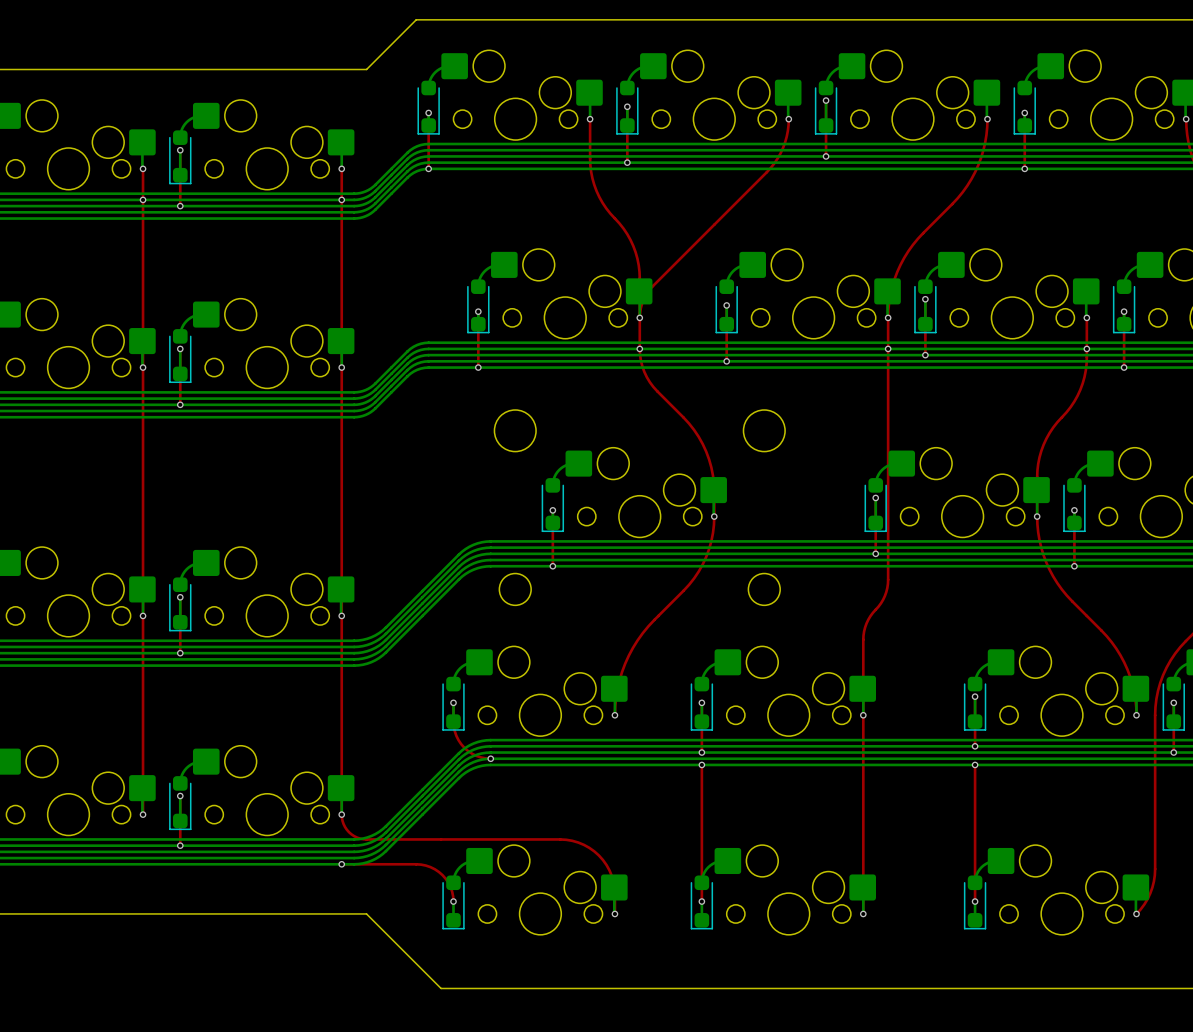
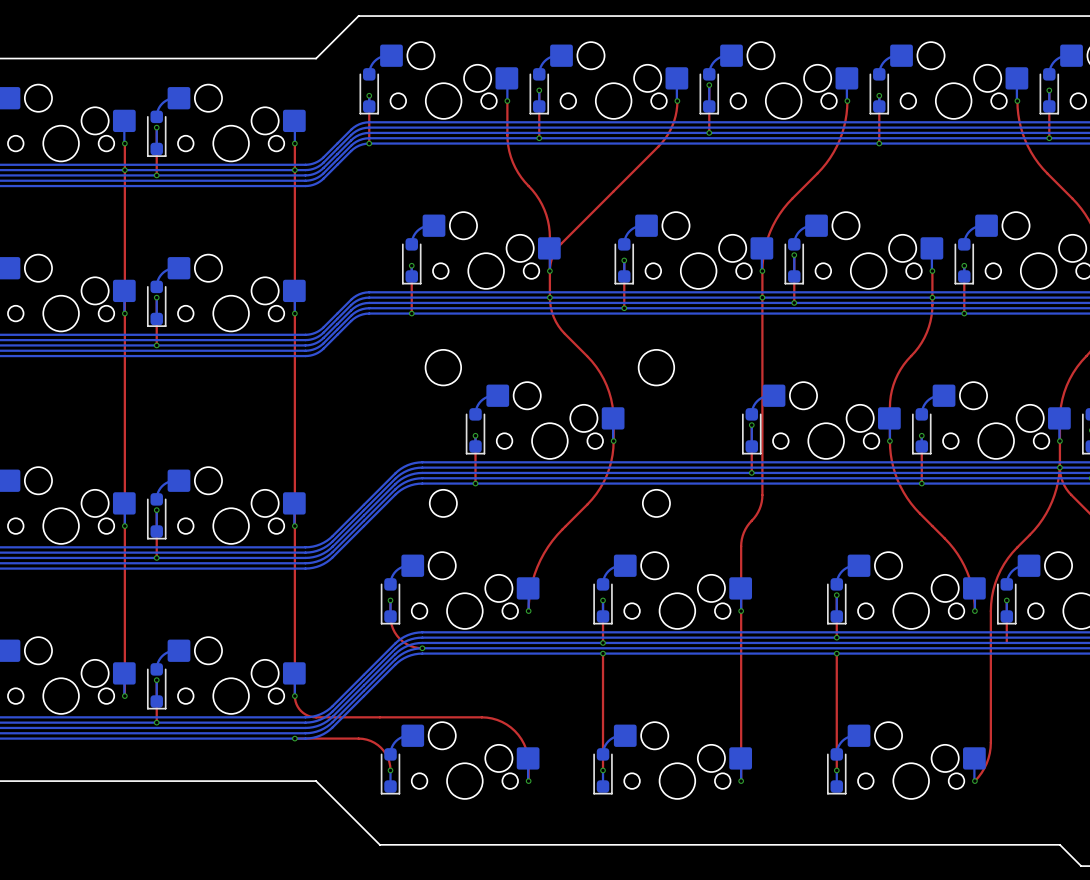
via: (1173, 752) -> none

